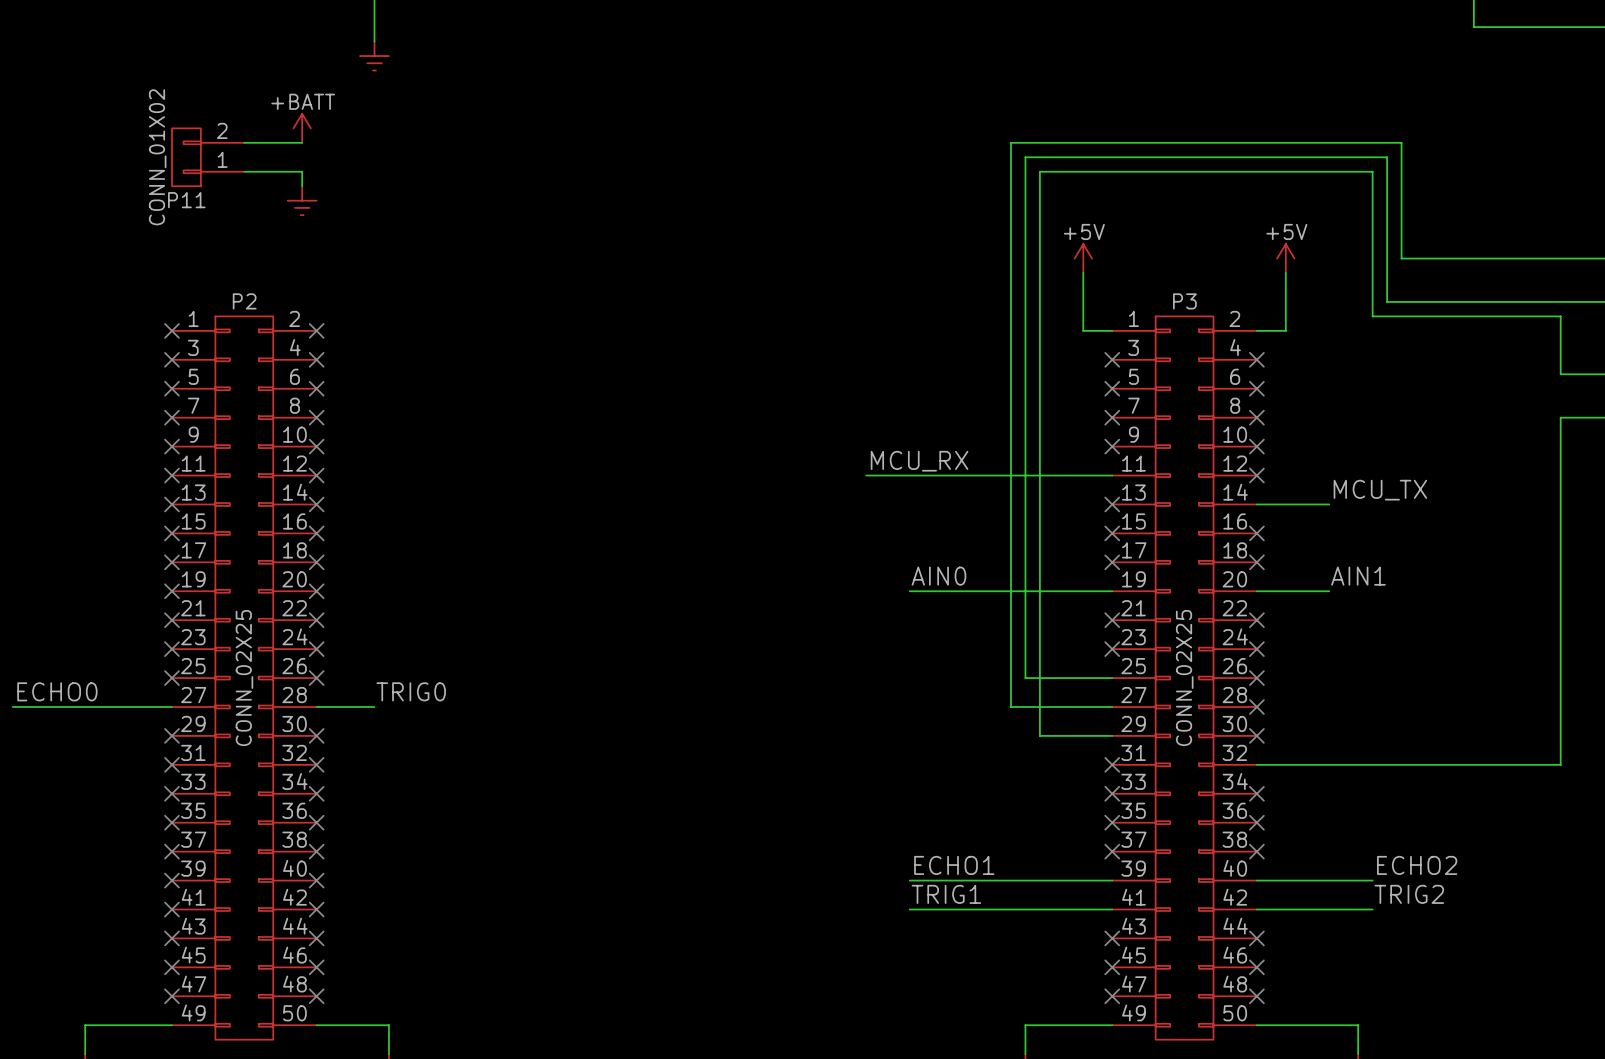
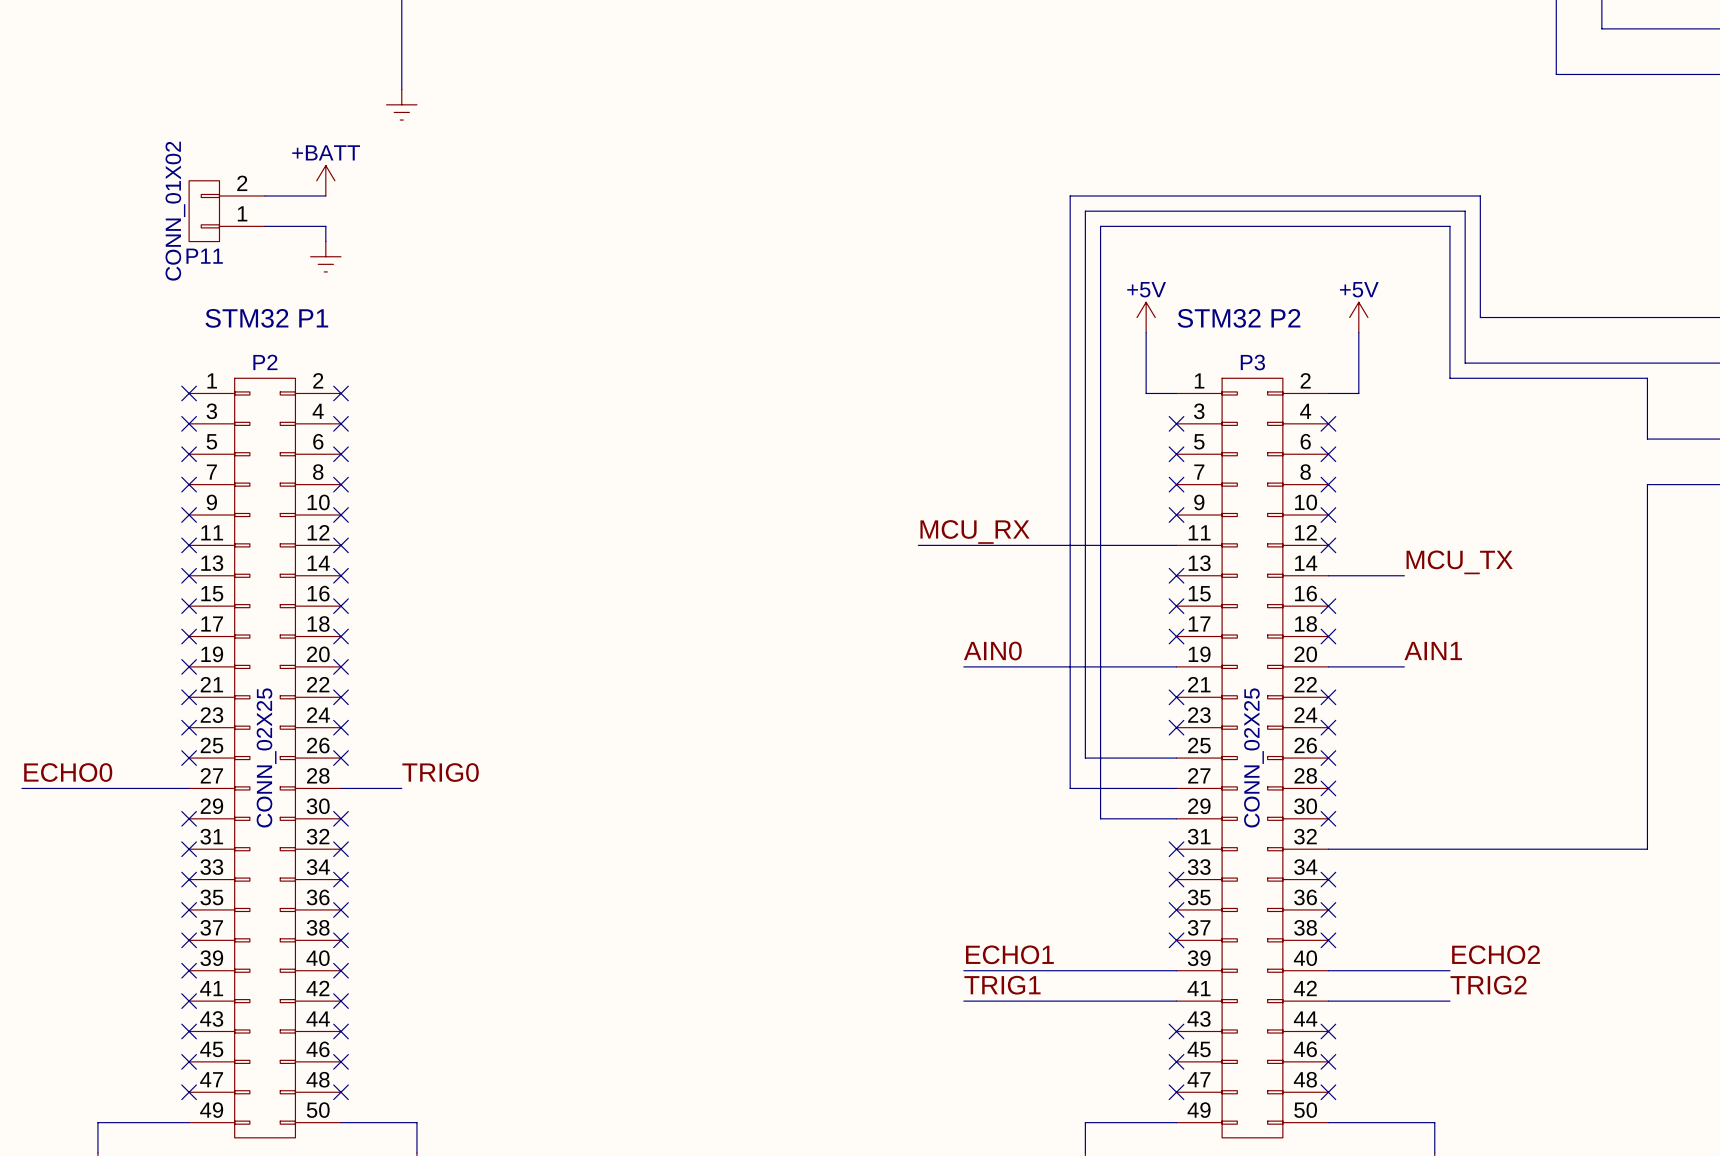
text: none -> STM32 P1 (266, 318)
text: none -> STM32 P2 (1239, 318)

